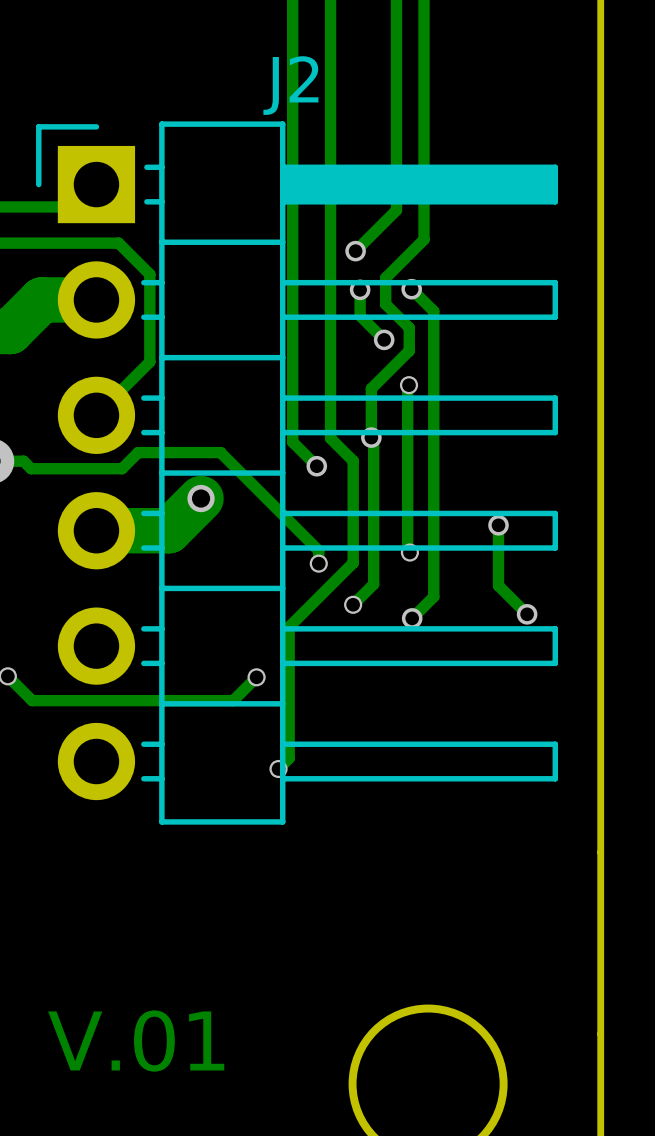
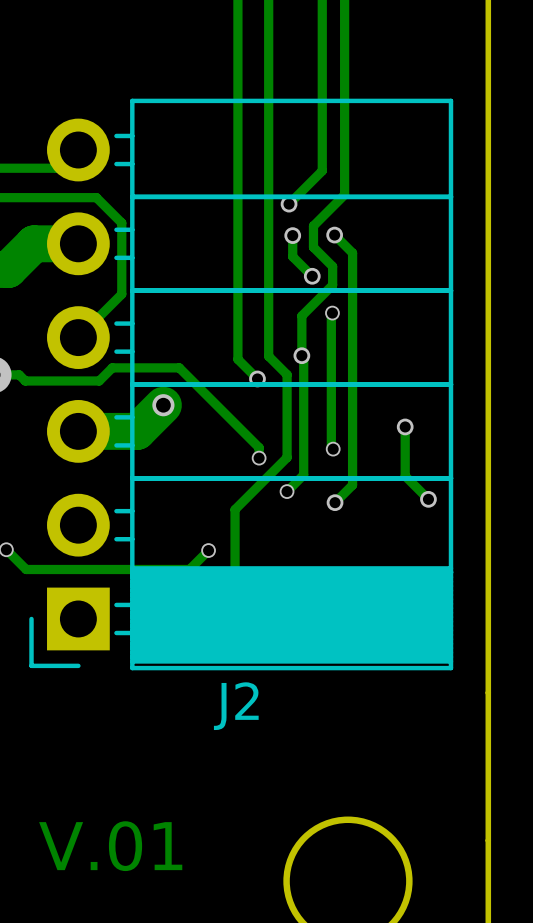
J2 name position: J2 (290, 85) -> J2 (236, 706)
J2 footprint: [36, 121, 559, 825] -> [29, 98, 454, 671]

